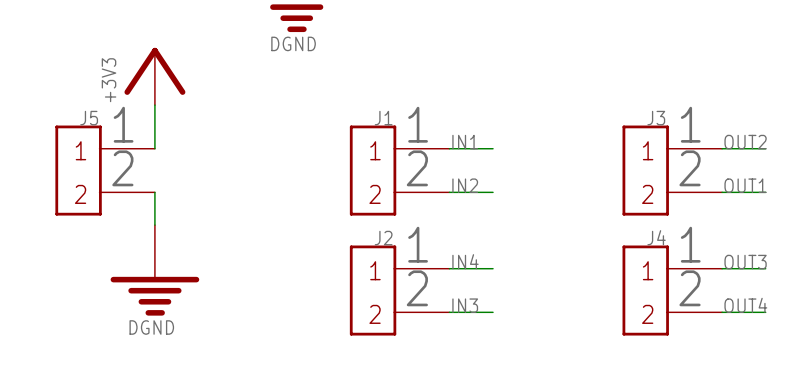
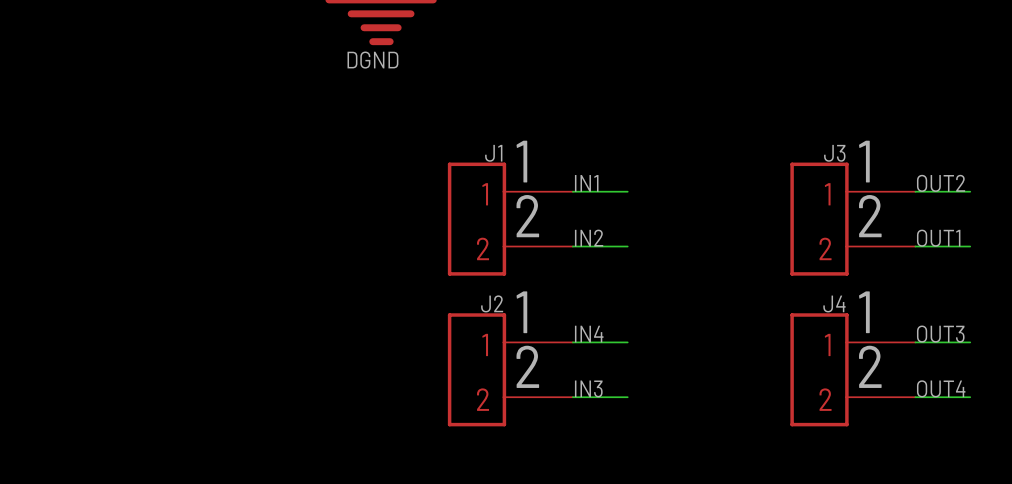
power symbol: +3V3 (154, 76) -> none
wire: (154, 105) (154, 148) -> none
J5: (105, 170) -> none
wire: (154, 192) (154, 225) -> none
power symbol: DGND (154, 270) -> none

